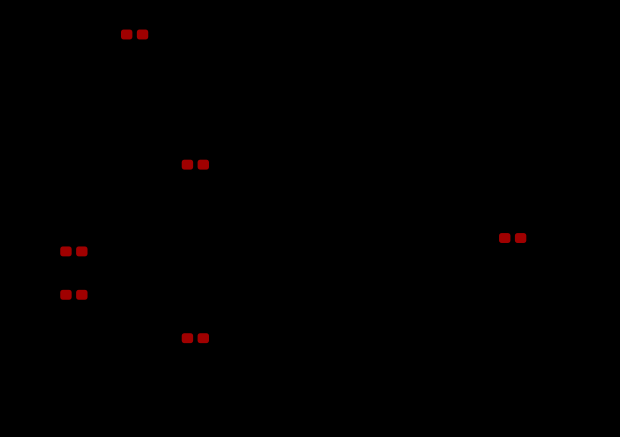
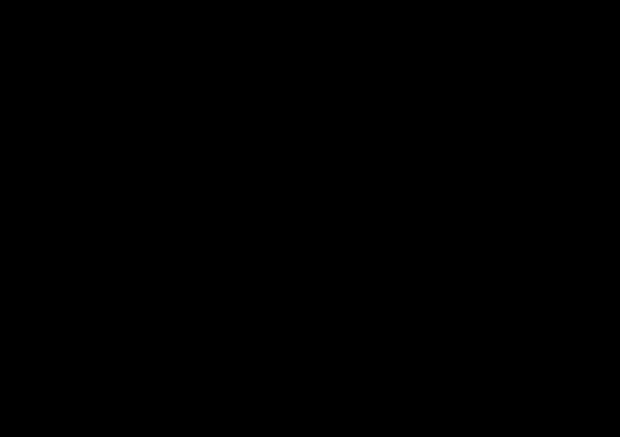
part: (134, 34) -> none
part: (195, 164) -> none
part: (512, 238) -> none
part: (73, 251) -> none
part: (73, 294) -> none
part: (195, 338) -> none

